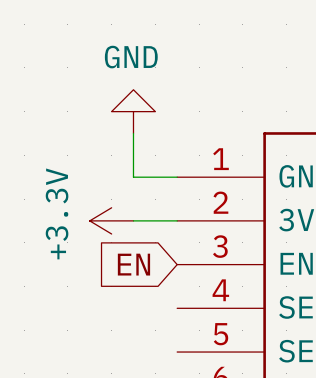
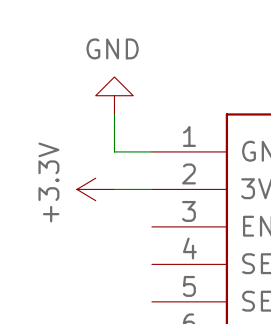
global label: EN (133, 264) -> none

